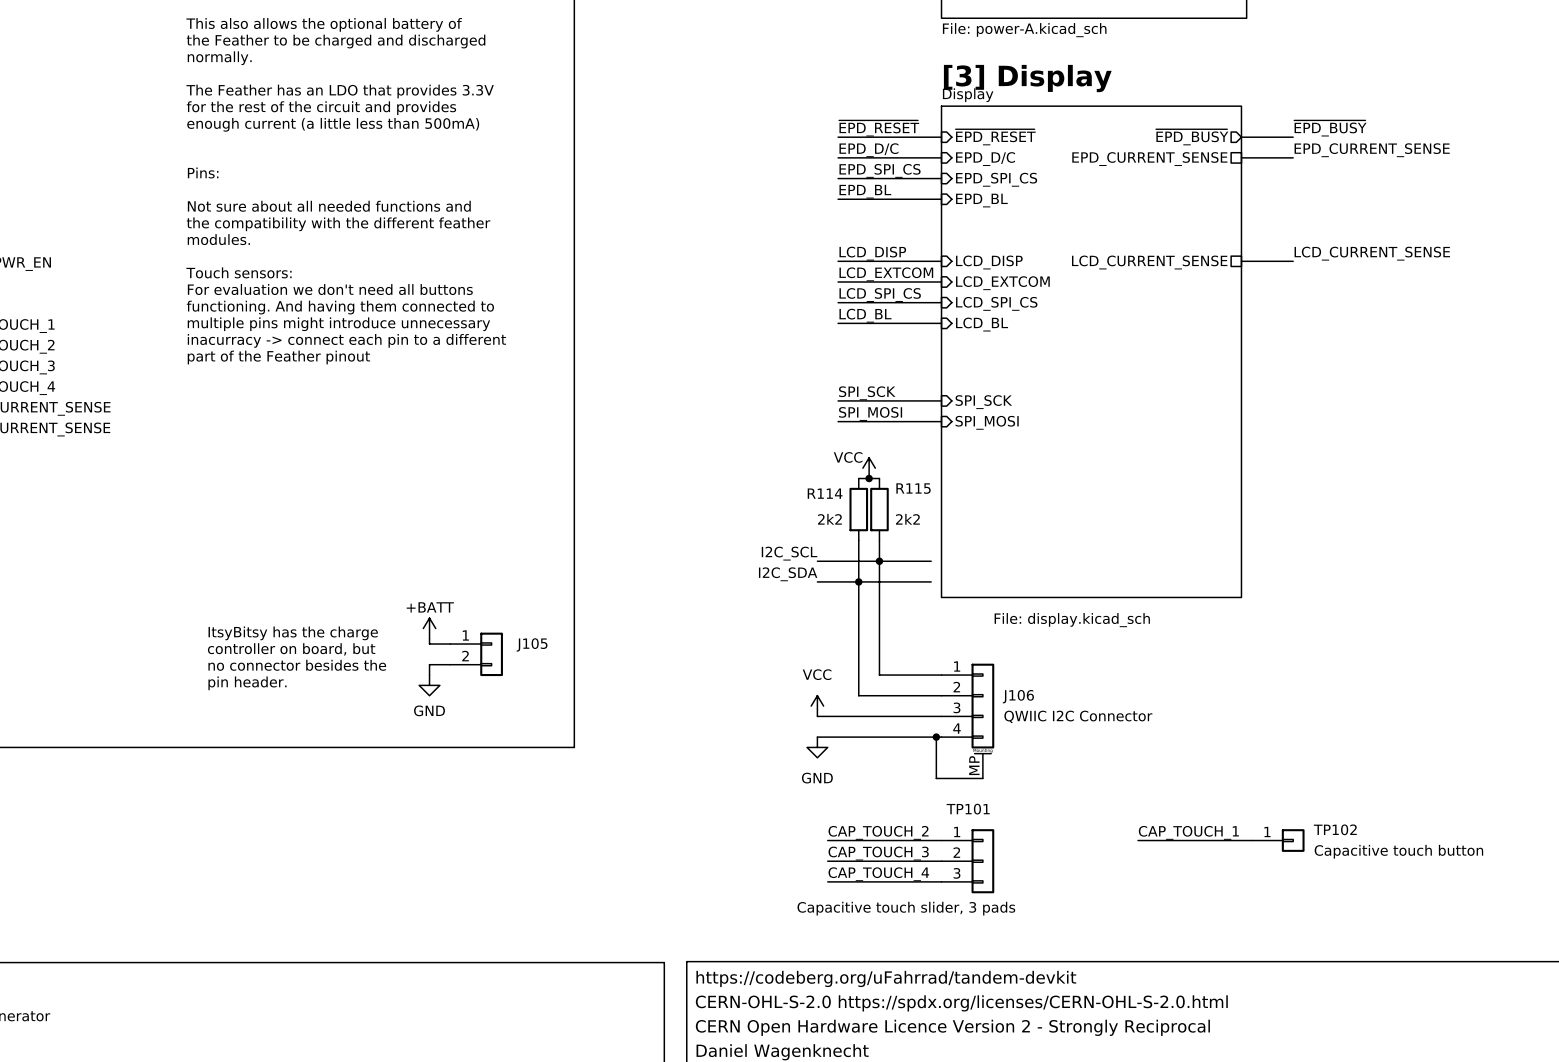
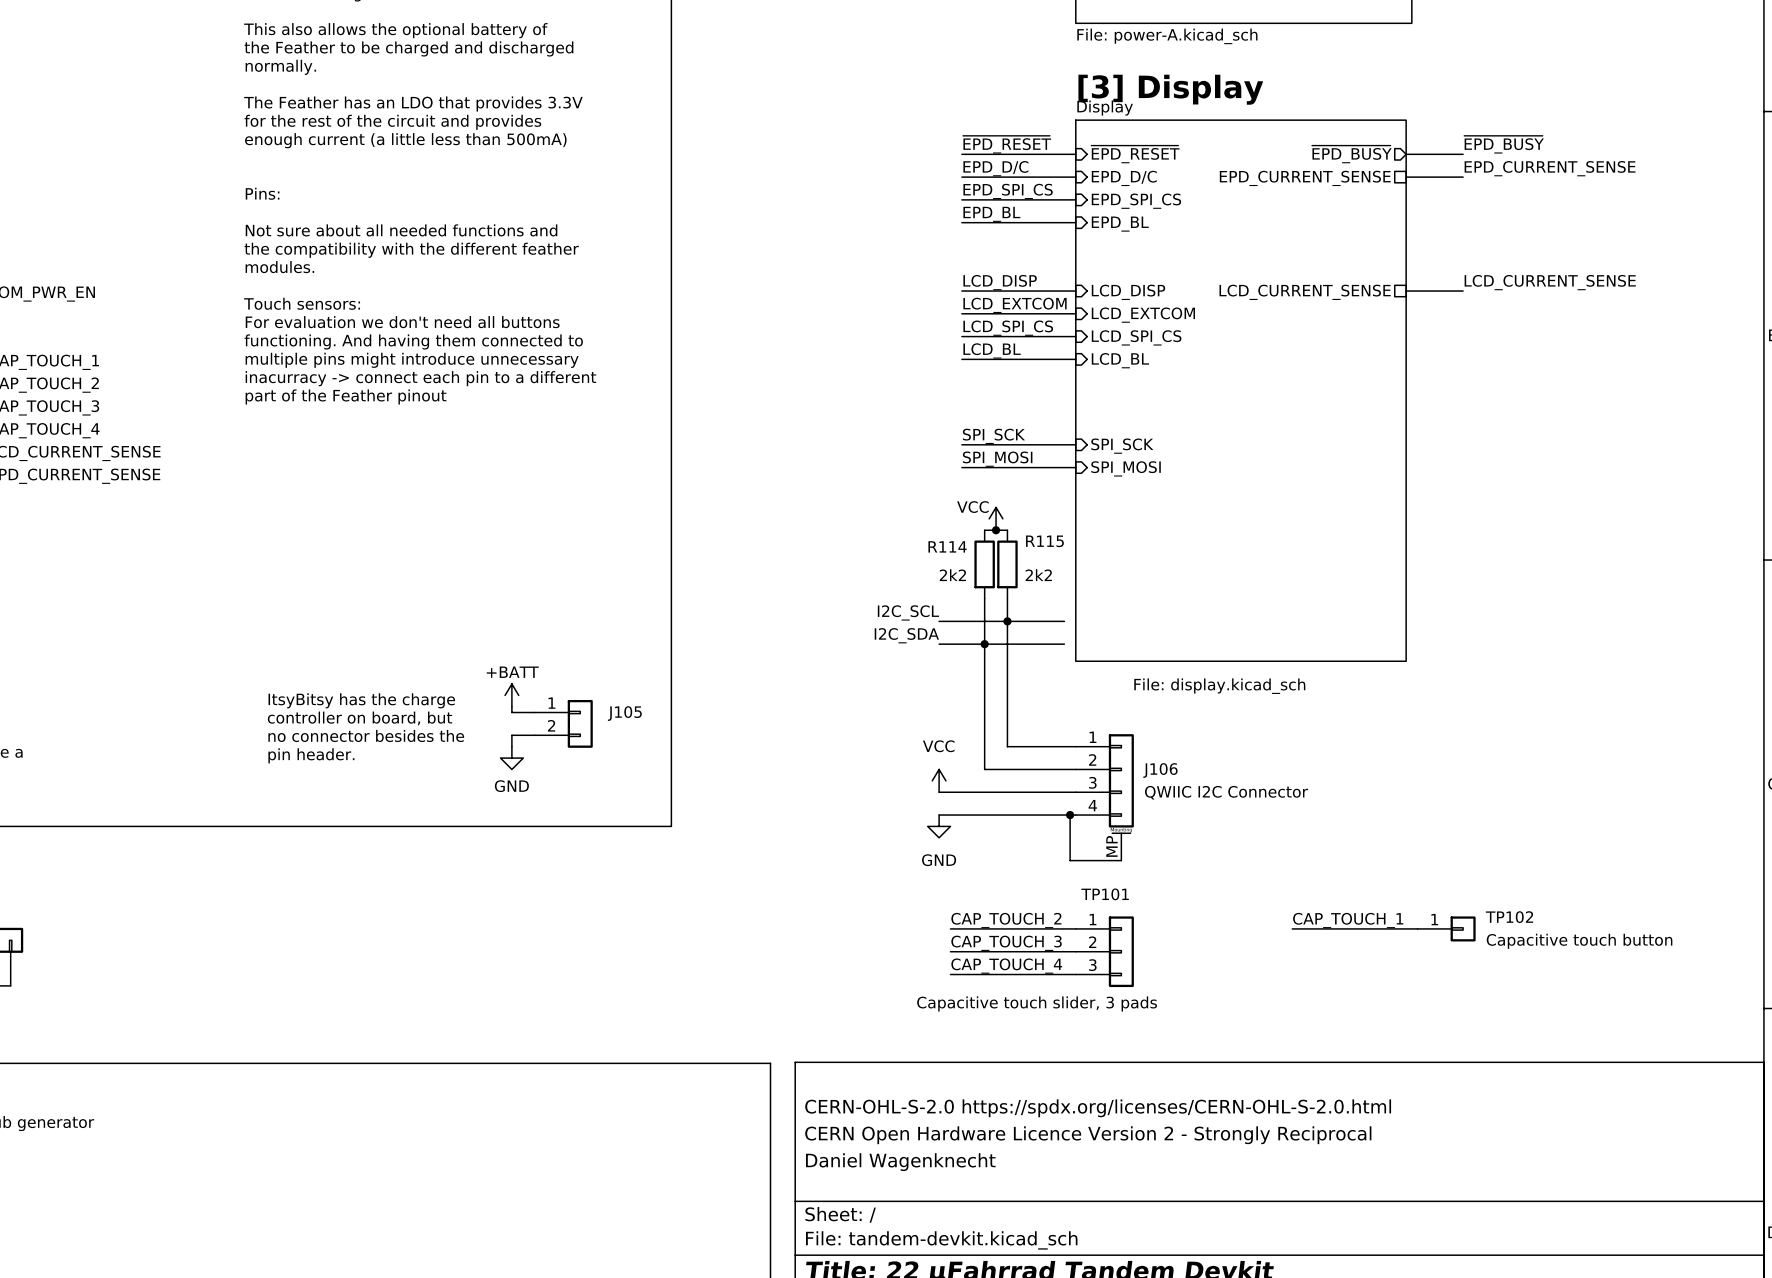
title block: https://codeberg.org/uFahrrad/tandem-devkit (886, 978) -> none

